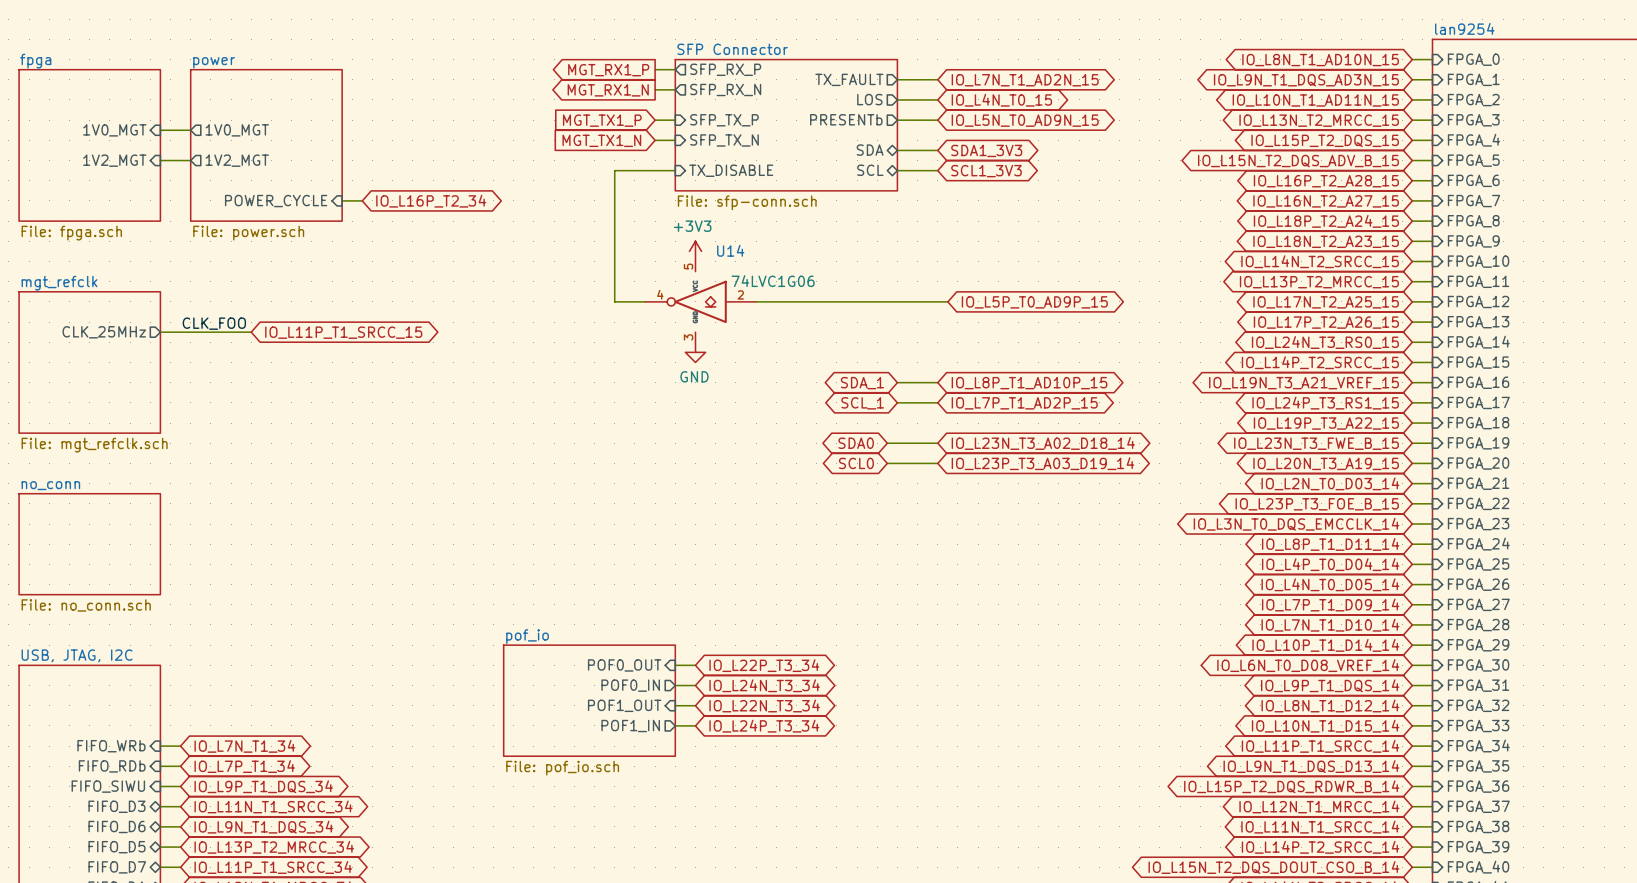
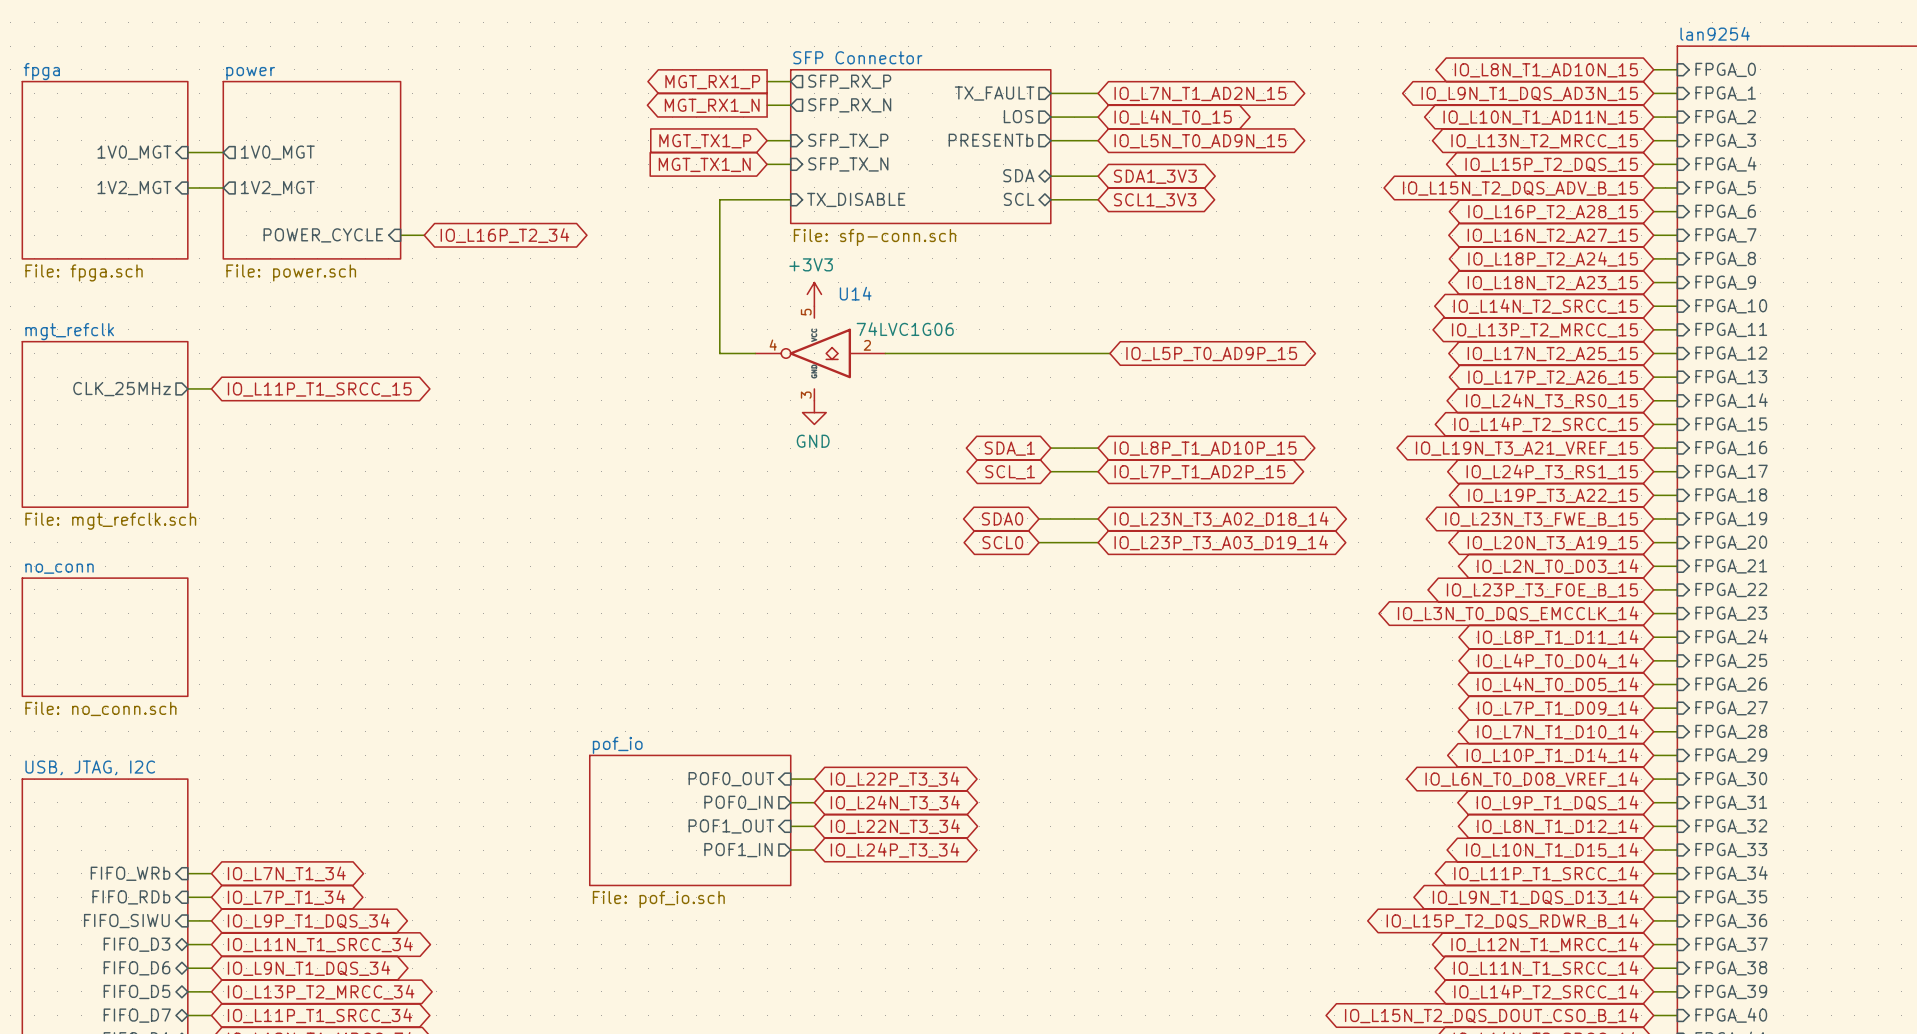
label: CLK_FOO (214, 323) -> none
wire: (180, 332) (251, 332) -> none
global label position: IO_L11P_T1_SRCC_15 (343, 332) -> IO_L11P_T1_SRCC_15 (319, 389)

